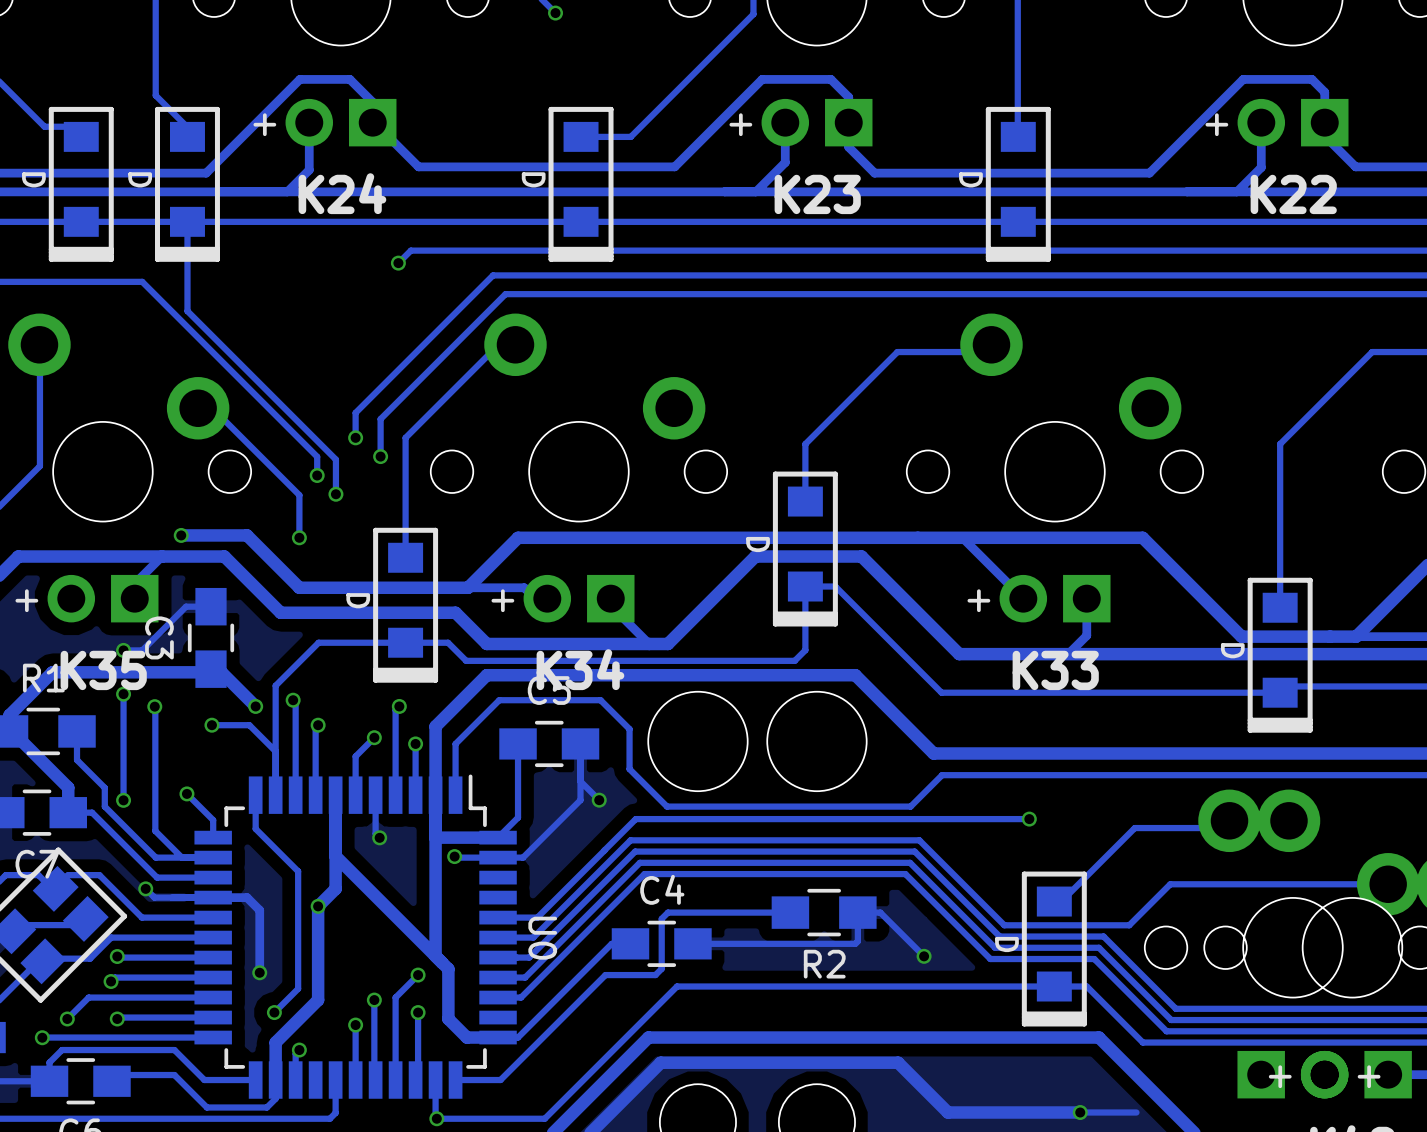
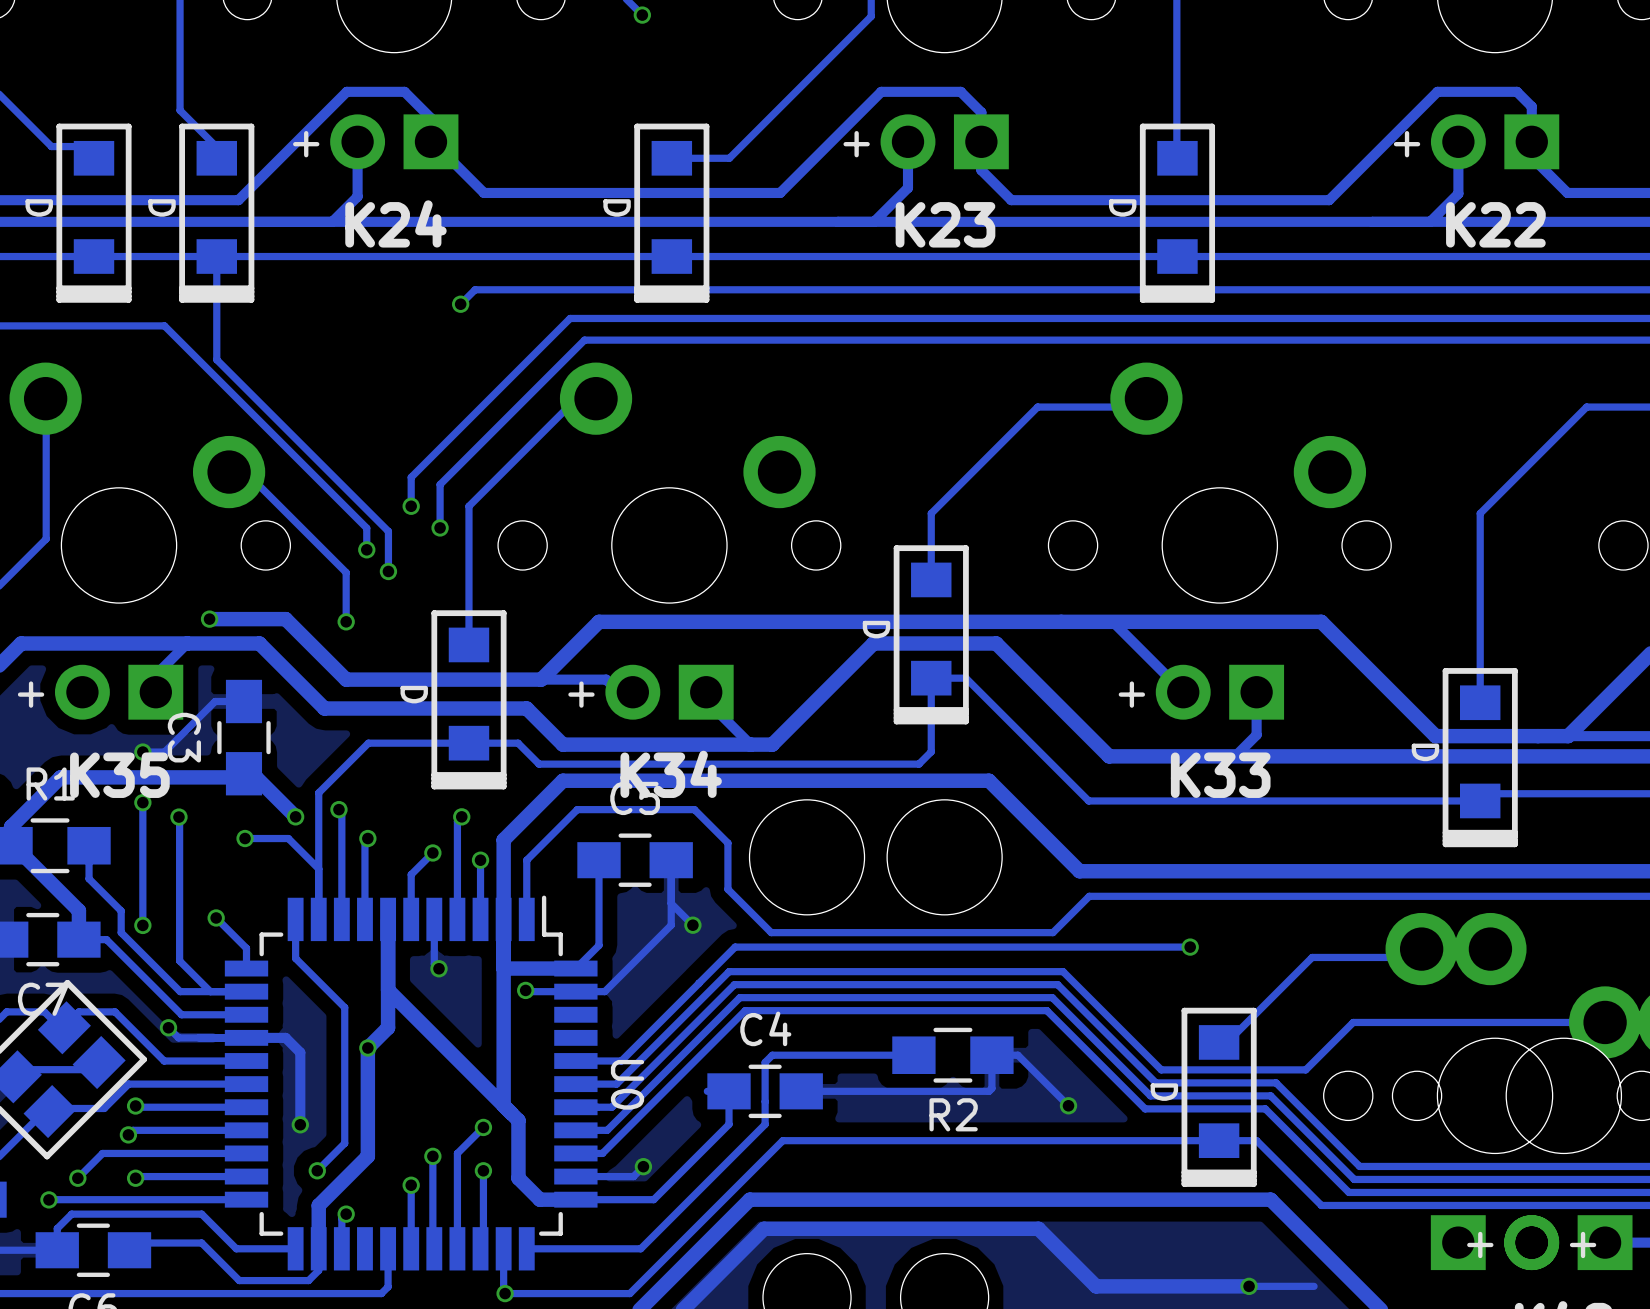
track: (611, 943) (518, 1037) -> (729, 1091) (729, 1124) (653, 1199) (598, 1199)
track: (661, 968) (655, 975) (605, 975) (500, 1080) -> (765, 1120) (765, 1124) (640, 1248) (578, 1248)
track: none -> (643, 1166) (633, 1176) (575, 1176)
via: none -> (643, 1166)

